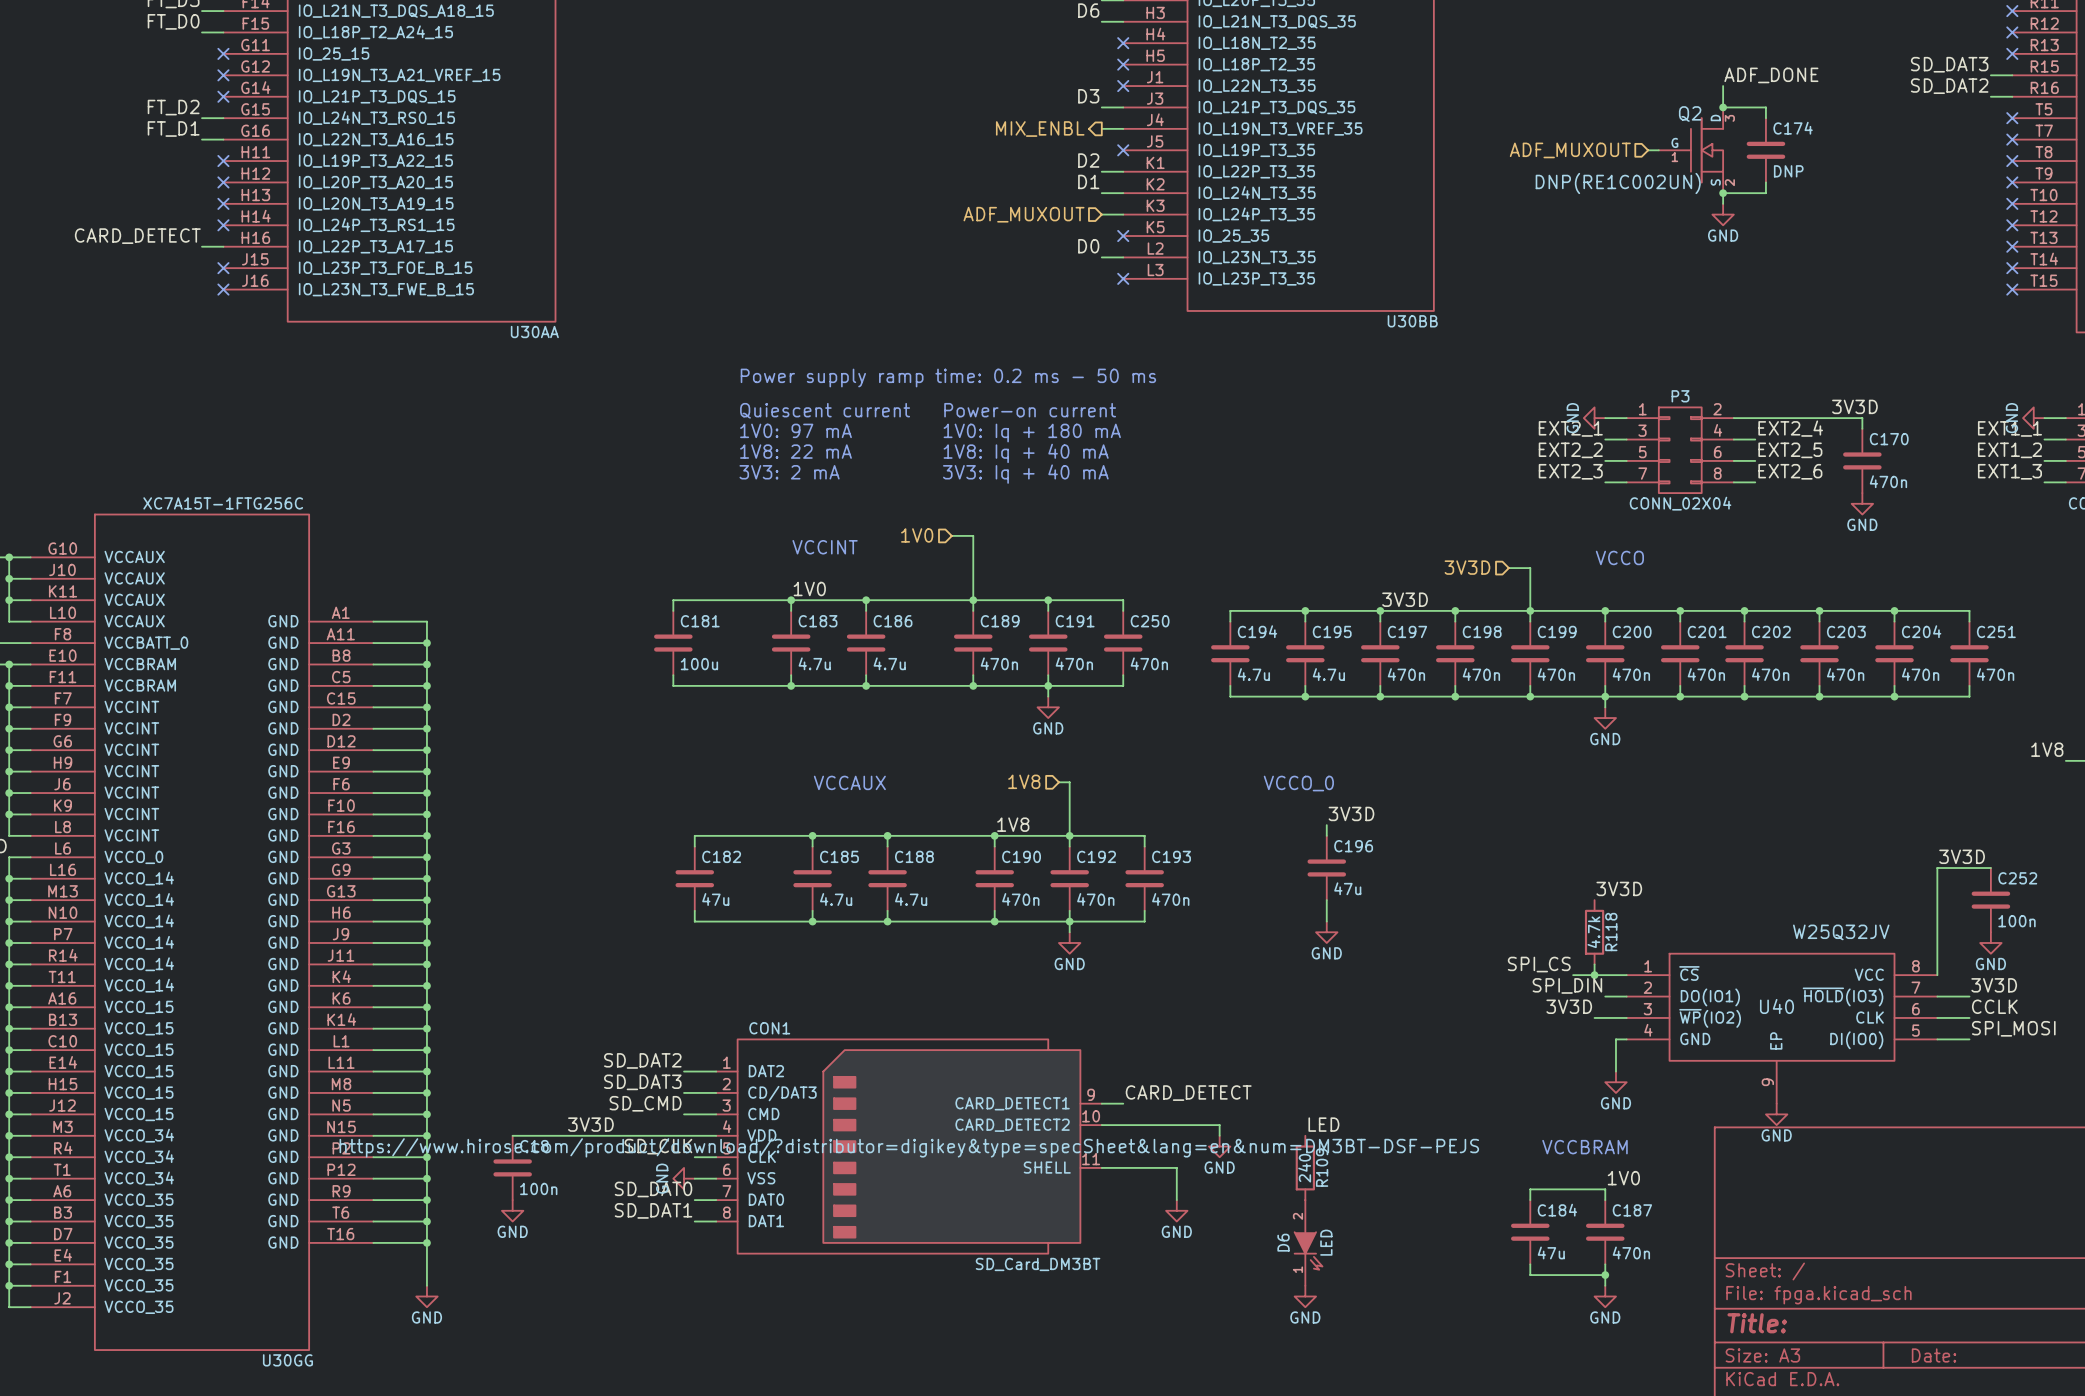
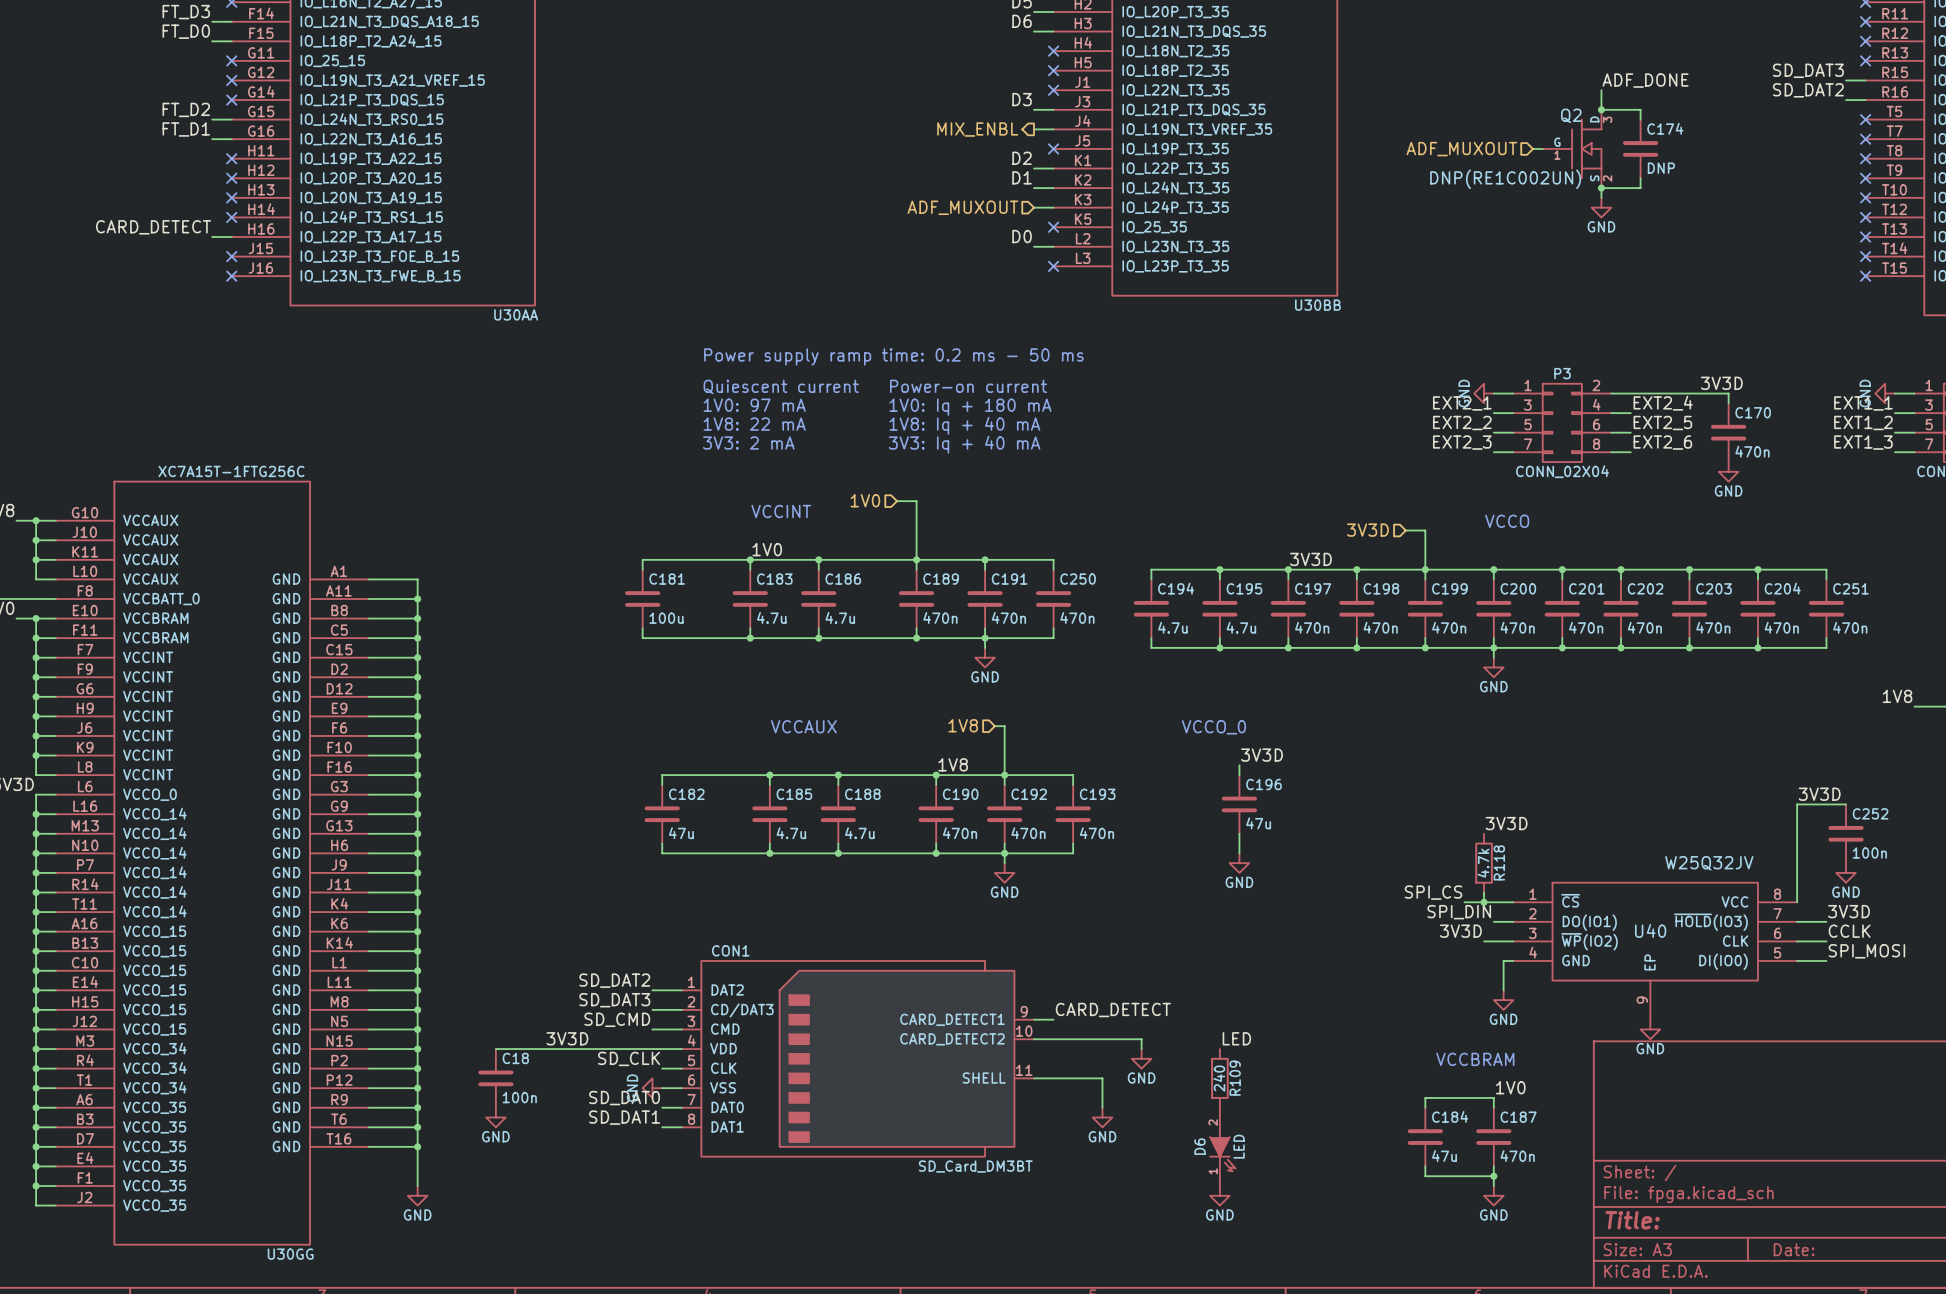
CON1 text: https://www.hirose.com/product/download/?distributor=digikey&type=specSheet&lang=en&num=DM3BT-DSF-PEJS (909, 1147) -> none

